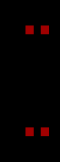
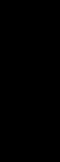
part: (37, 29) -> none
part: (37, 131) -> none

